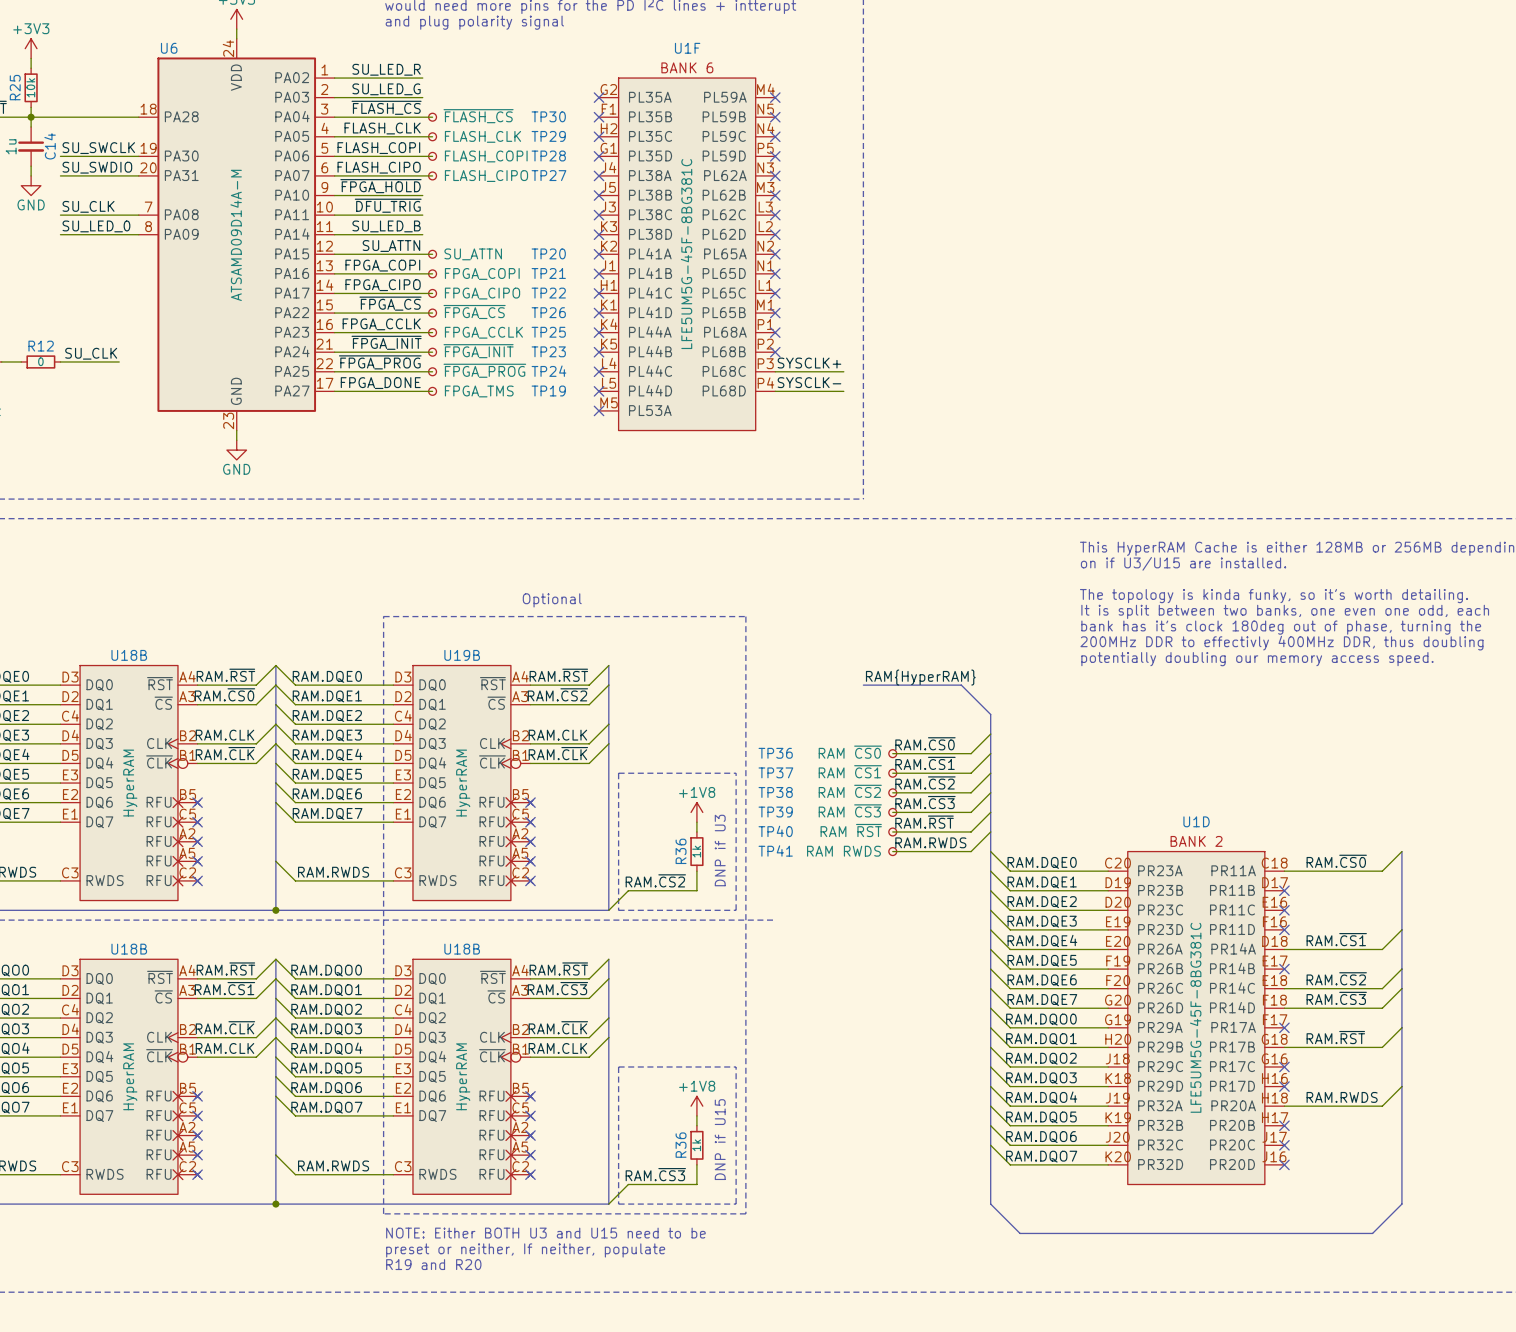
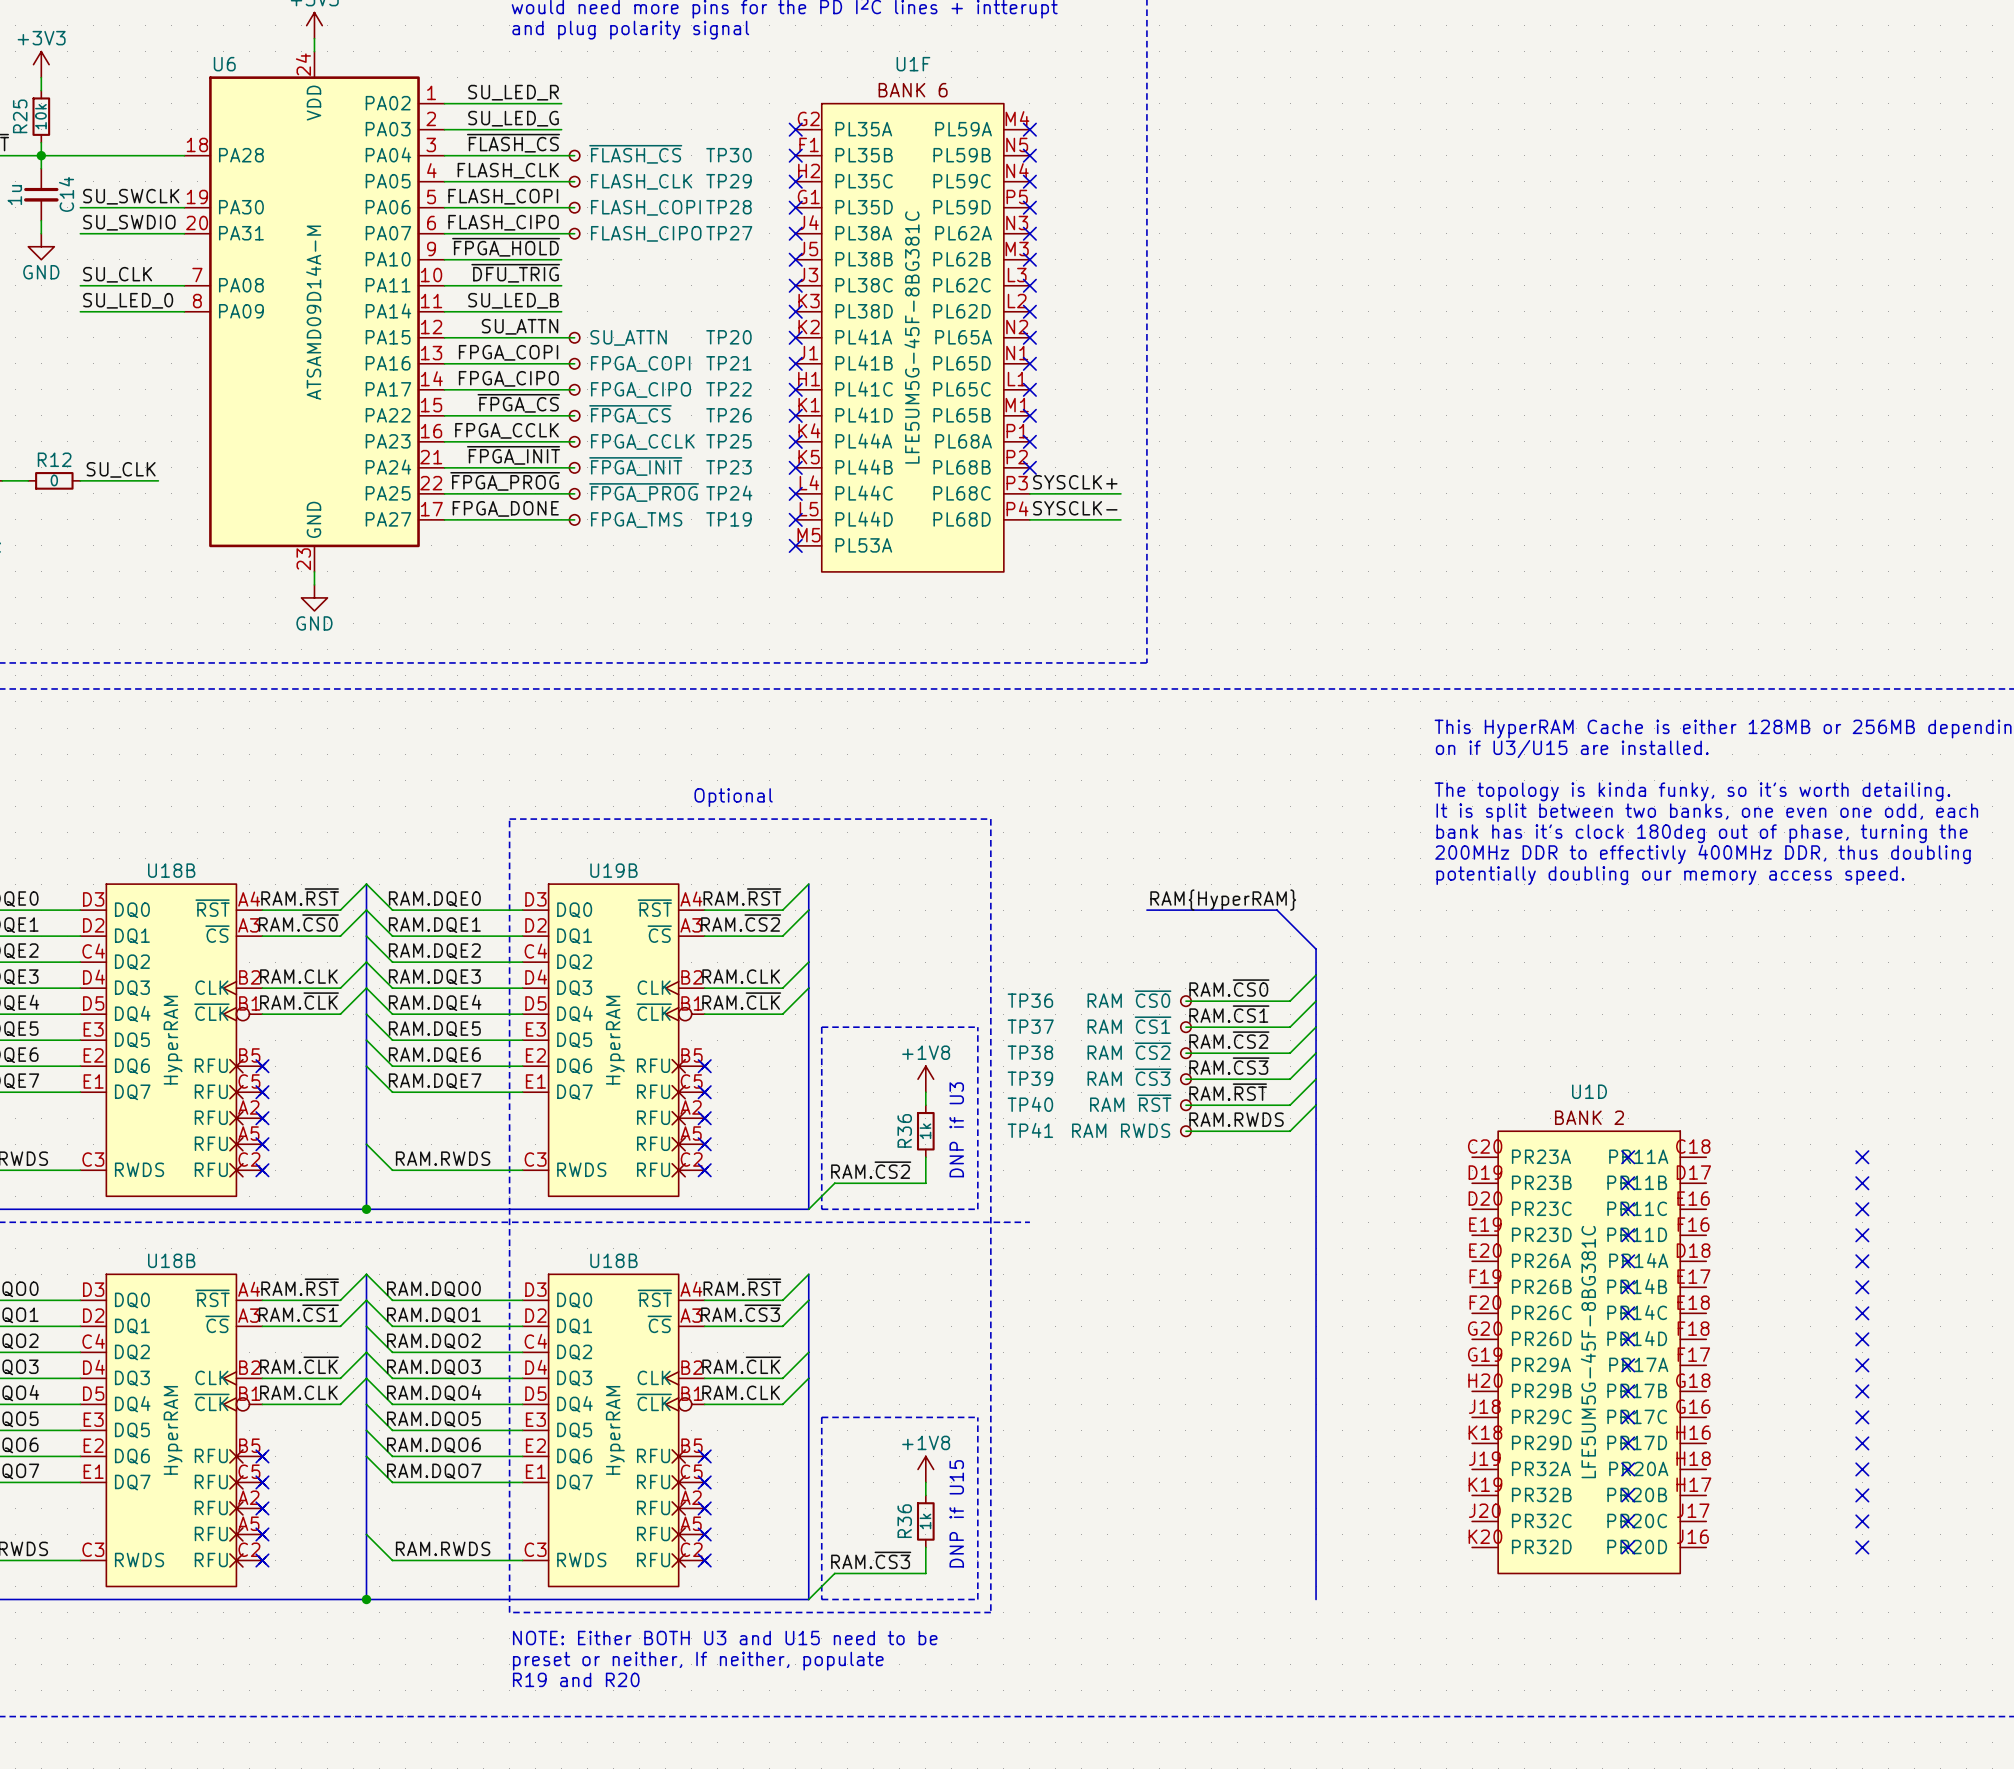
wire: (990, 851) (1010, 871) (1108, 871) -> none
wire: (1401, 851) (1382, 871) (1284, 871) -> none
bus: (1401, 851) (1401, 1204) (1372, 1233) (1020, 1233) (990, 1204) -> none
label: RAM.~{CS0} (1336, 861) -> none
label: RAM.DQE0 (1042, 862) -> none
wire: (990, 871) (1010, 890) (1108, 890) -> none
no-connect mark: none -> (1628, 1157)
no-connect mark: none -> (1862, 1157)
label: RAM.DQE1 (1042, 882) -> none
wire: (990, 890) (1010, 910) (1108, 910) -> none
no-connect mark: none -> (1628, 1183)
no-connect mark: (1284, 890) -> none
no-connect mark: none -> (1862, 1183)
label: RAM.DQE2 (1042, 902) -> none
wire: (990, 910) (1010, 929) (1108, 929) -> none
no-connect mark: none -> (1628, 1209)
no-connect mark: (1284, 910) -> none
no-connect mark: none -> (1862, 1209)
label: RAM.DQE3 (1042, 921) -> none
wire: (990, 929) (1010, 949) (1108, 949) -> none
no-connect mark: none -> (1628, 1235)
no-connect mark: (1284, 929) -> none
wire: (1401, 929) (1382, 949) (1284, 949) -> none
no-connect mark: none -> (1862, 1235)
label: RAM.~{CS1} (1336, 939) -> none
label: RAM.DQE4 (1042, 940) -> none
wire: (990, 949) (1010, 969) (1108, 969) -> none
no-connect mark: none -> (1628, 1261)
no-connect mark: none -> (1862, 1261)
label: RAM.DQE5 (1042, 960) -> none
wire: (990, 969) (1010, 988) (1108, 988) -> none
no-connect mark: none -> (1628, 1287)
no-connect mark: (1284, 969) -> none
wire: (1401, 969) (1382, 988) (1284, 988) -> none
no-connect mark: none -> (1862, 1287)
label: RAM.~{CS2} (1336, 978) -> none
label: RAM.DQE6 (1042, 980) -> none
wire: (990, 988) (1010, 1008) (1108, 1008) -> none
no-connect mark: none -> (1628, 1313)
wire: (1401, 988) (1382, 1008) (1284, 1008) -> none
no-connect mark: none -> (1862, 1313)
label: RAM.~{CS3} (1336, 998) -> none
label: RAM.DQE7 (1042, 999) -> none
wire: (990, 1008) (1010, 1027) (1108, 1027) -> none
no-connect mark: none -> (1628, 1339)
no-connect mark: none -> (1862, 1339)
label: RAM.DQO0 (1041, 1019) -> none
wire: (990, 1027) (1010, 1047) (1108, 1047) -> none
no-connect mark: none -> (1628, 1365)
no-connect mark: (1284, 1027) -> none
wire: (1401, 1027) (1382, 1047) (1284, 1047) -> none
no-connect mark: none -> (1862, 1365)
label: RAM.~{RST} (1335, 1037) -> none
label: RAM.DQO1 (1041, 1039) -> none
wire: (990, 1047) (1010, 1066) (1108, 1066) -> none
no-connect mark: none -> (1628, 1391)
no-connect mark: none -> (1862, 1391)
label: RAM.DQO2 (1041, 1058) -> none
wire: (990, 1066) (1010, 1086) (1108, 1086) -> none
no-connect mark: none -> (1628, 1417)
no-connect mark: (1284, 1066) -> none
no-connect mark: none -> (1862, 1417)
label: RAM.DQO3 (1041, 1078) -> none
wire: (990, 1086) (1010, 1106) (1108, 1106) -> none
no-connect mark: none -> (1628, 1443)
no-connect mark: (1284, 1086) -> none
wire: (1401, 1086) (1382, 1106) (1284, 1106) -> none
no-connect mark: none -> (1862, 1443)
label: RAM.DQO4 (1041, 1097) -> none
label: RAM.RWDS (1342, 1097) -> none
wire: (990, 1106) (1010, 1125) (1108, 1125) -> none
no-connect mark: none -> (1628, 1469)
no-connect mark: none -> (1862, 1469)
label: RAM.DQO5 (1041, 1117) -> none
wire: (990, 1125) (1010, 1145) (1108, 1145) -> none
no-connect mark: none -> (1628, 1495)
no-connect mark: (1284, 1125) -> none
no-connect mark: none -> (1862, 1495)
label: RAM.DQO6 (1041, 1137) -> none
wire: (990, 1145) (1010, 1164) (1108, 1164) -> none
no-connect mark: none -> (1628, 1521)
no-connect mark: (1284, 1145) -> none
no-connect mark: none -> (1862, 1521)
label: RAM.DQO7 (1041, 1156) -> none
no-connect mark: none -> (1628, 1547)
no-connect mark: (1284, 1164) -> none
no-connect mark: none -> (1862, 1547)

